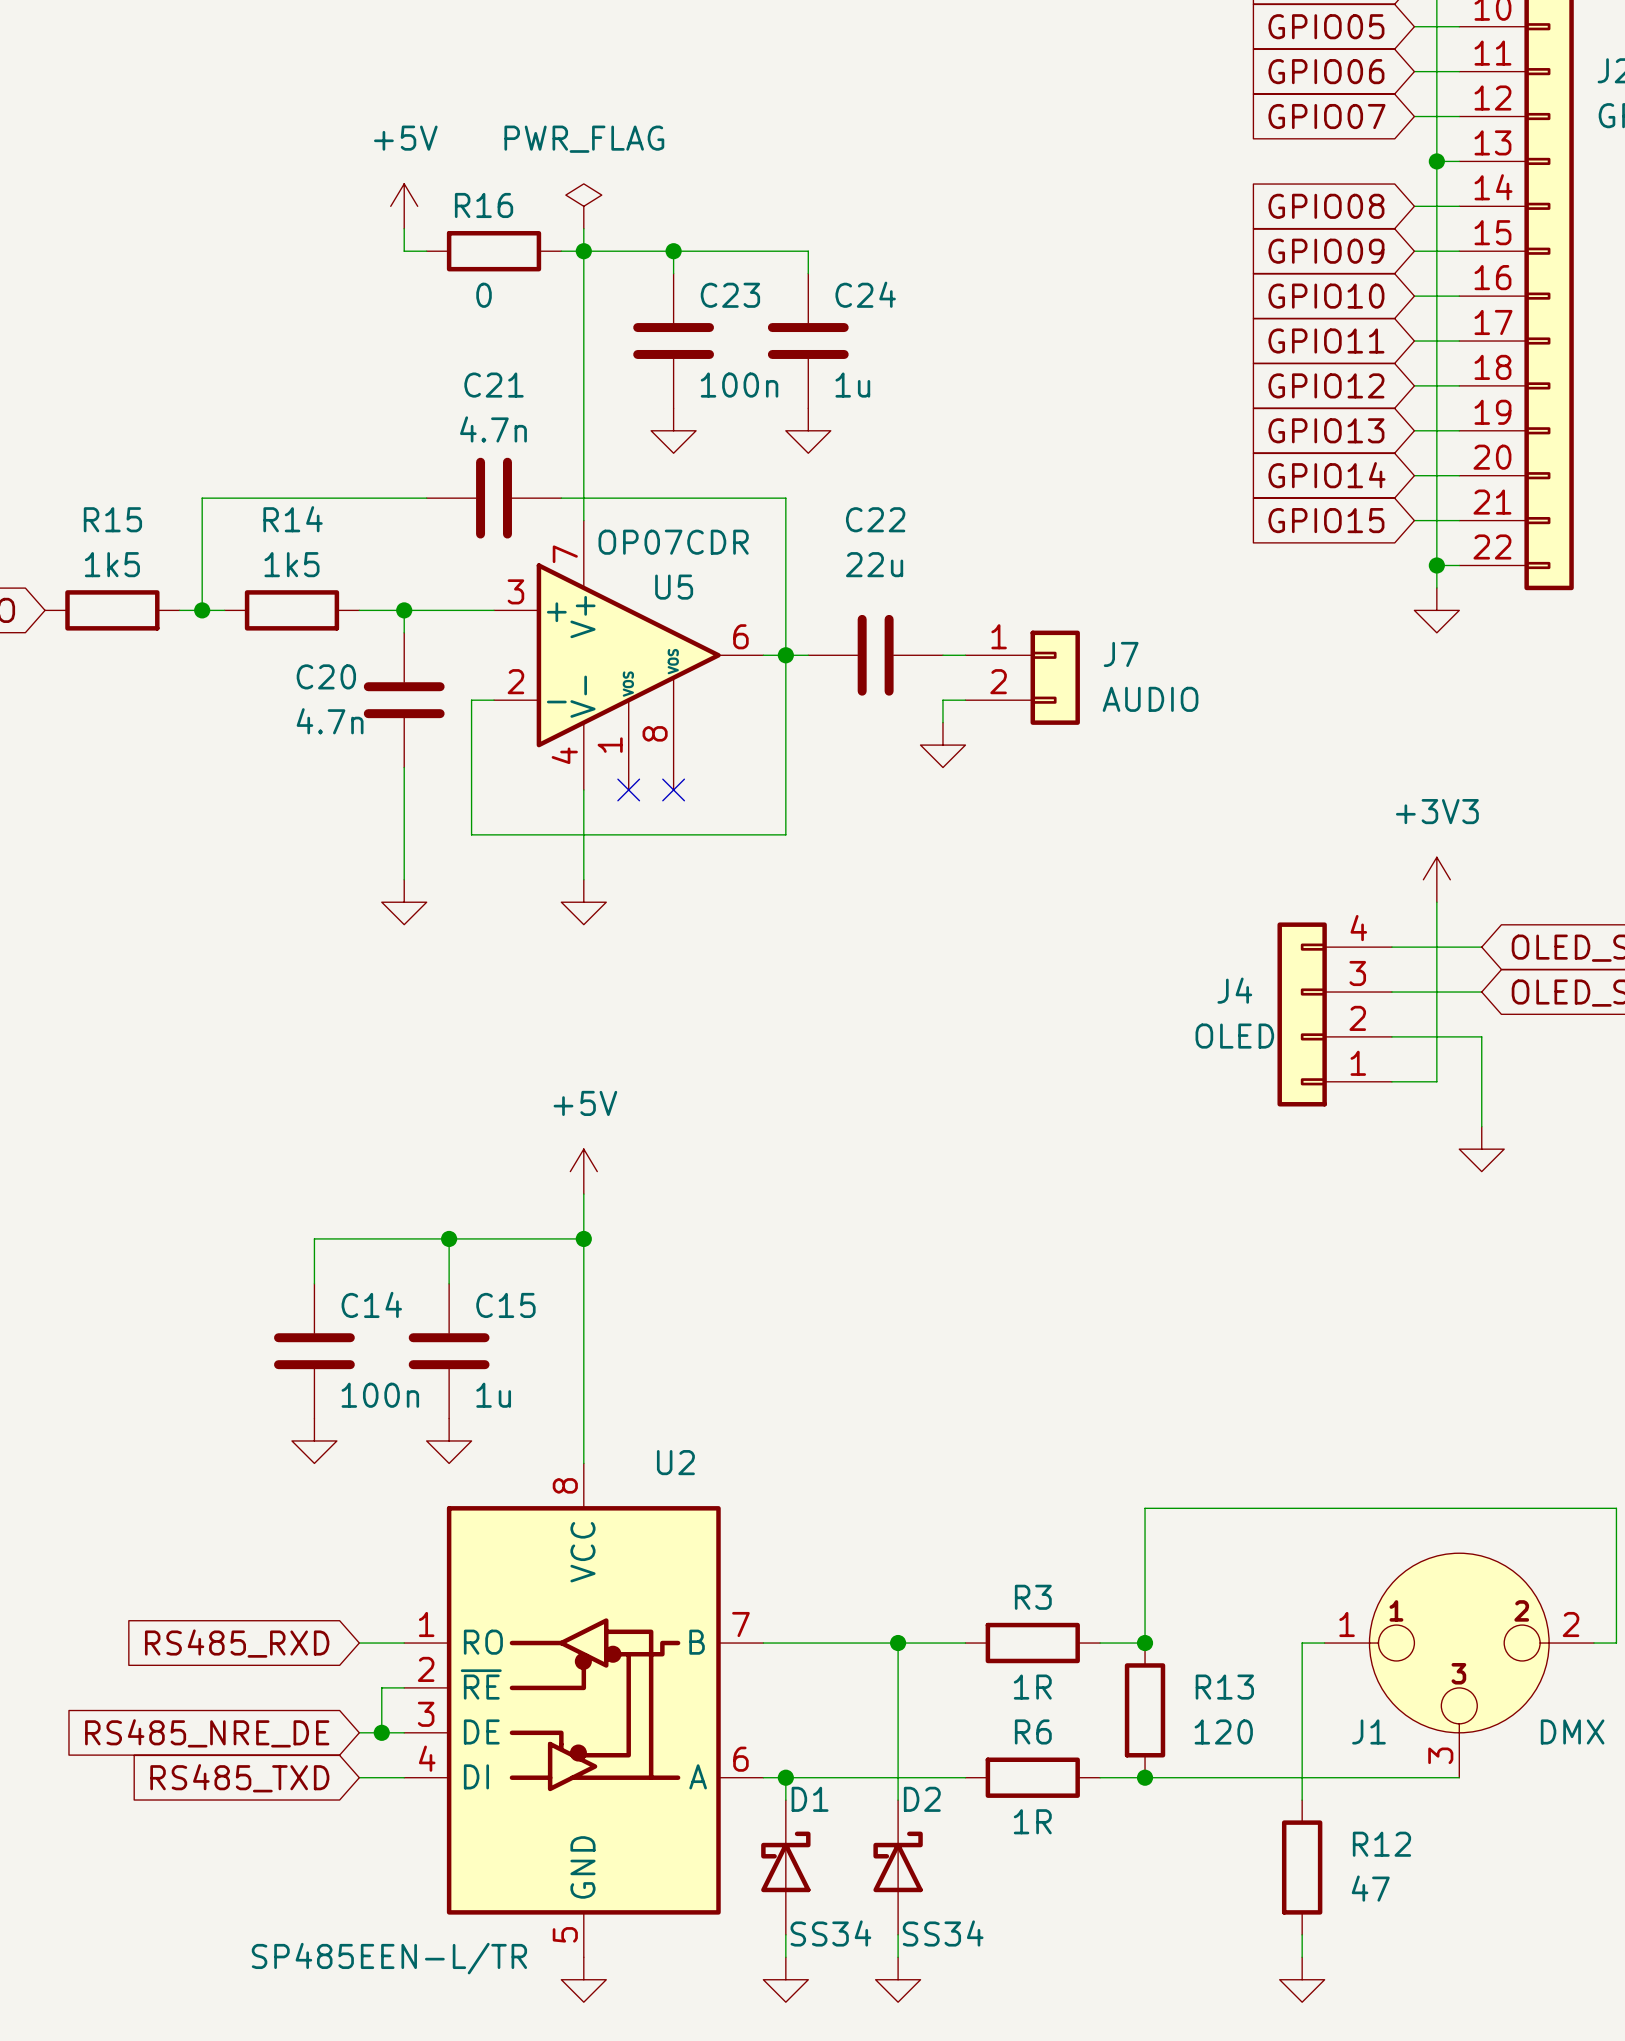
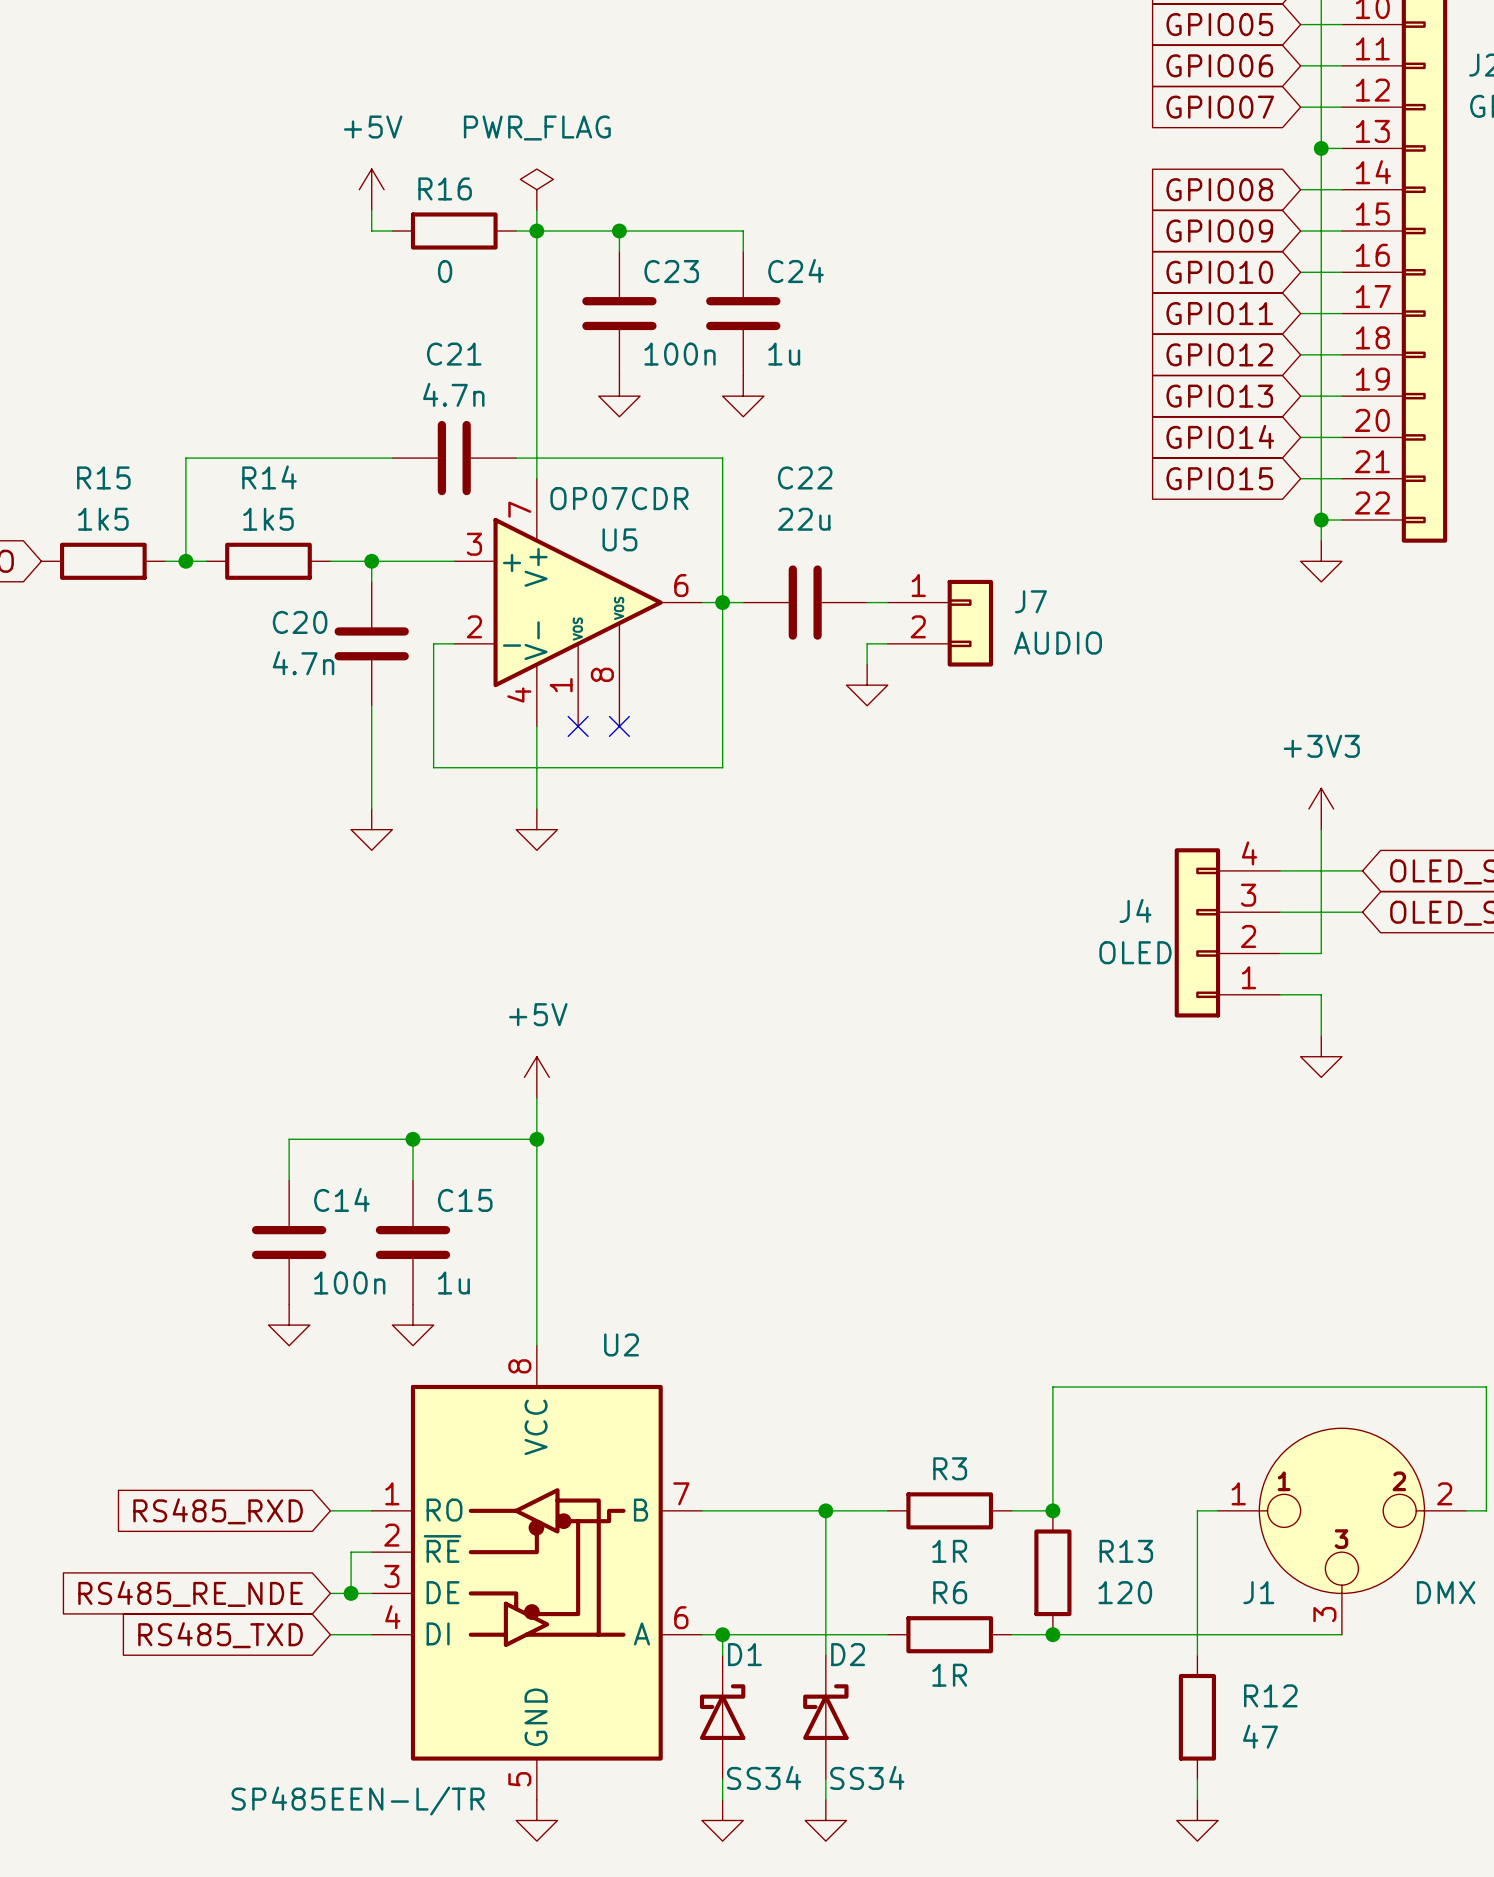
wire: (1436, 1081) (1436, 1036) (1481, 1036) (1481, 1126) -> (1321, 994) (1321, 1036)
power symbol position: (1481, 1149) -> (1321, 1056)
global label: RS485_NRE_DE (207, 1733) -> RS485_RE_NDE (190, 1593)

